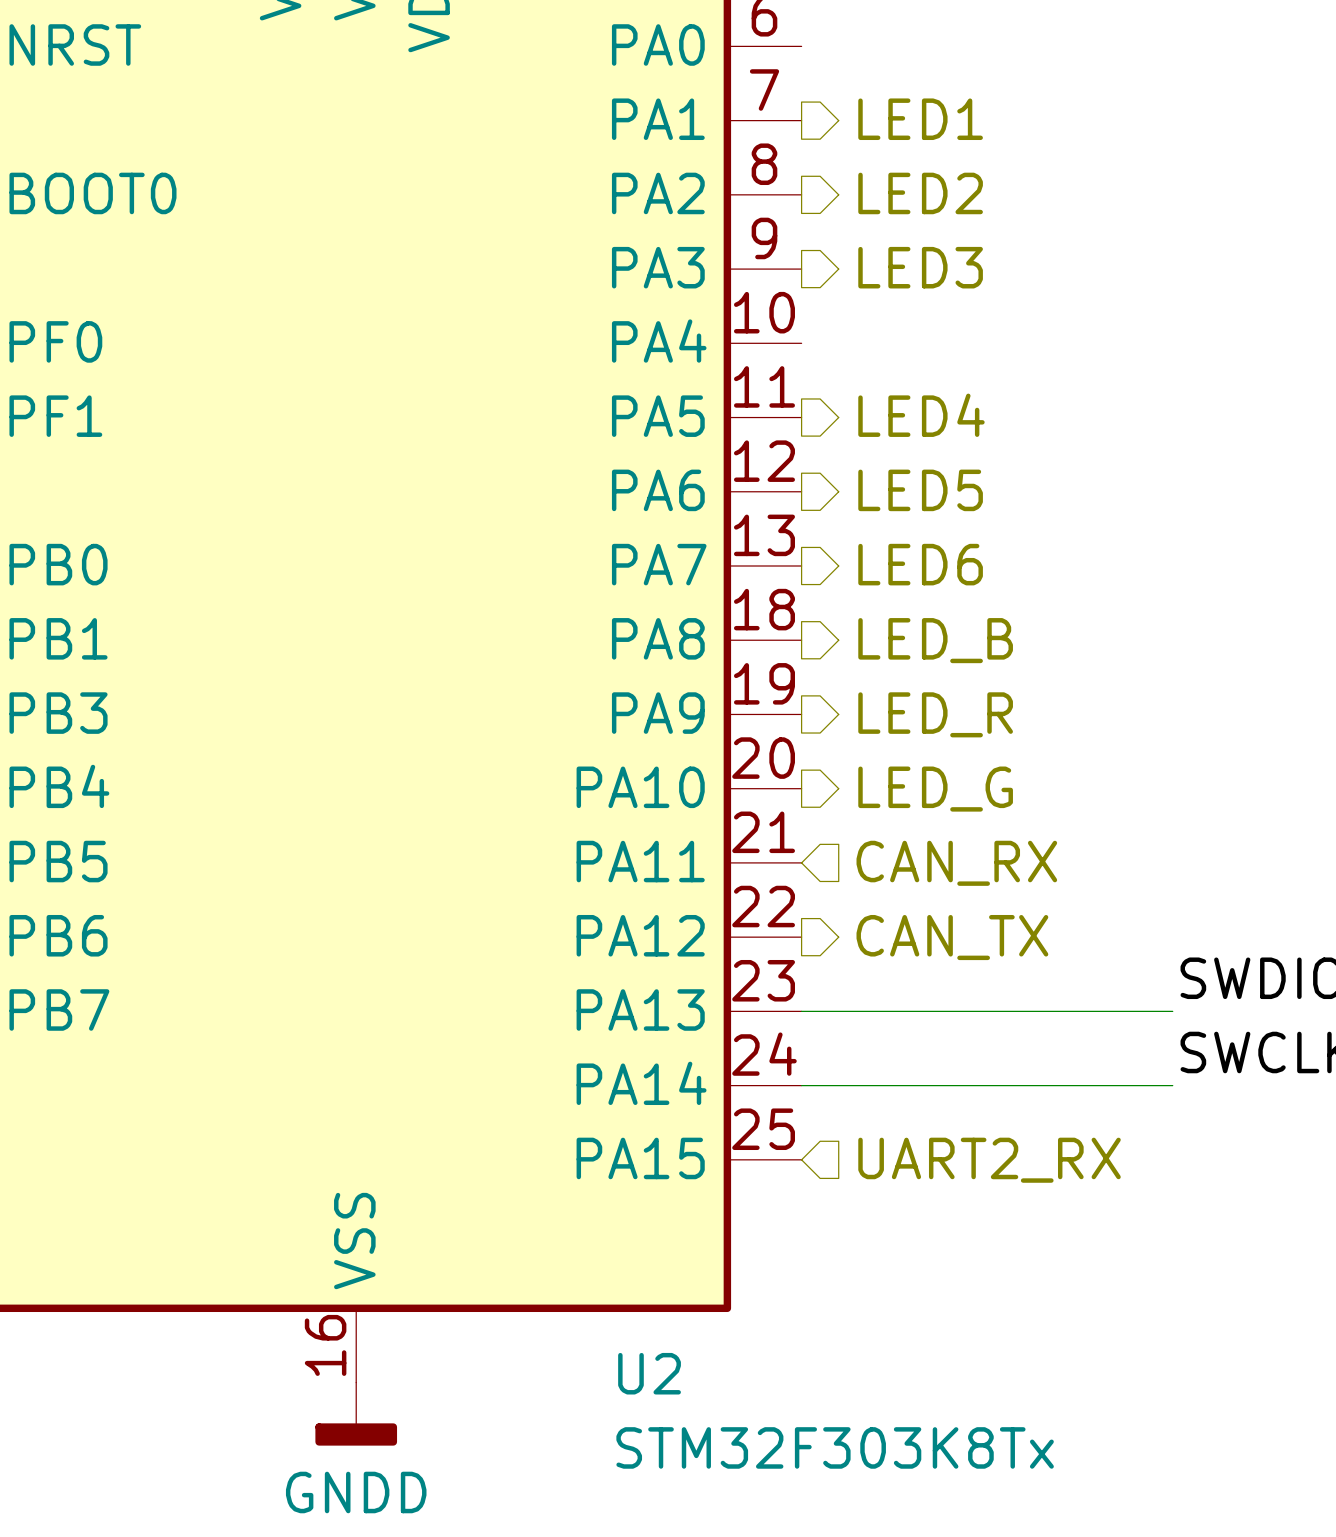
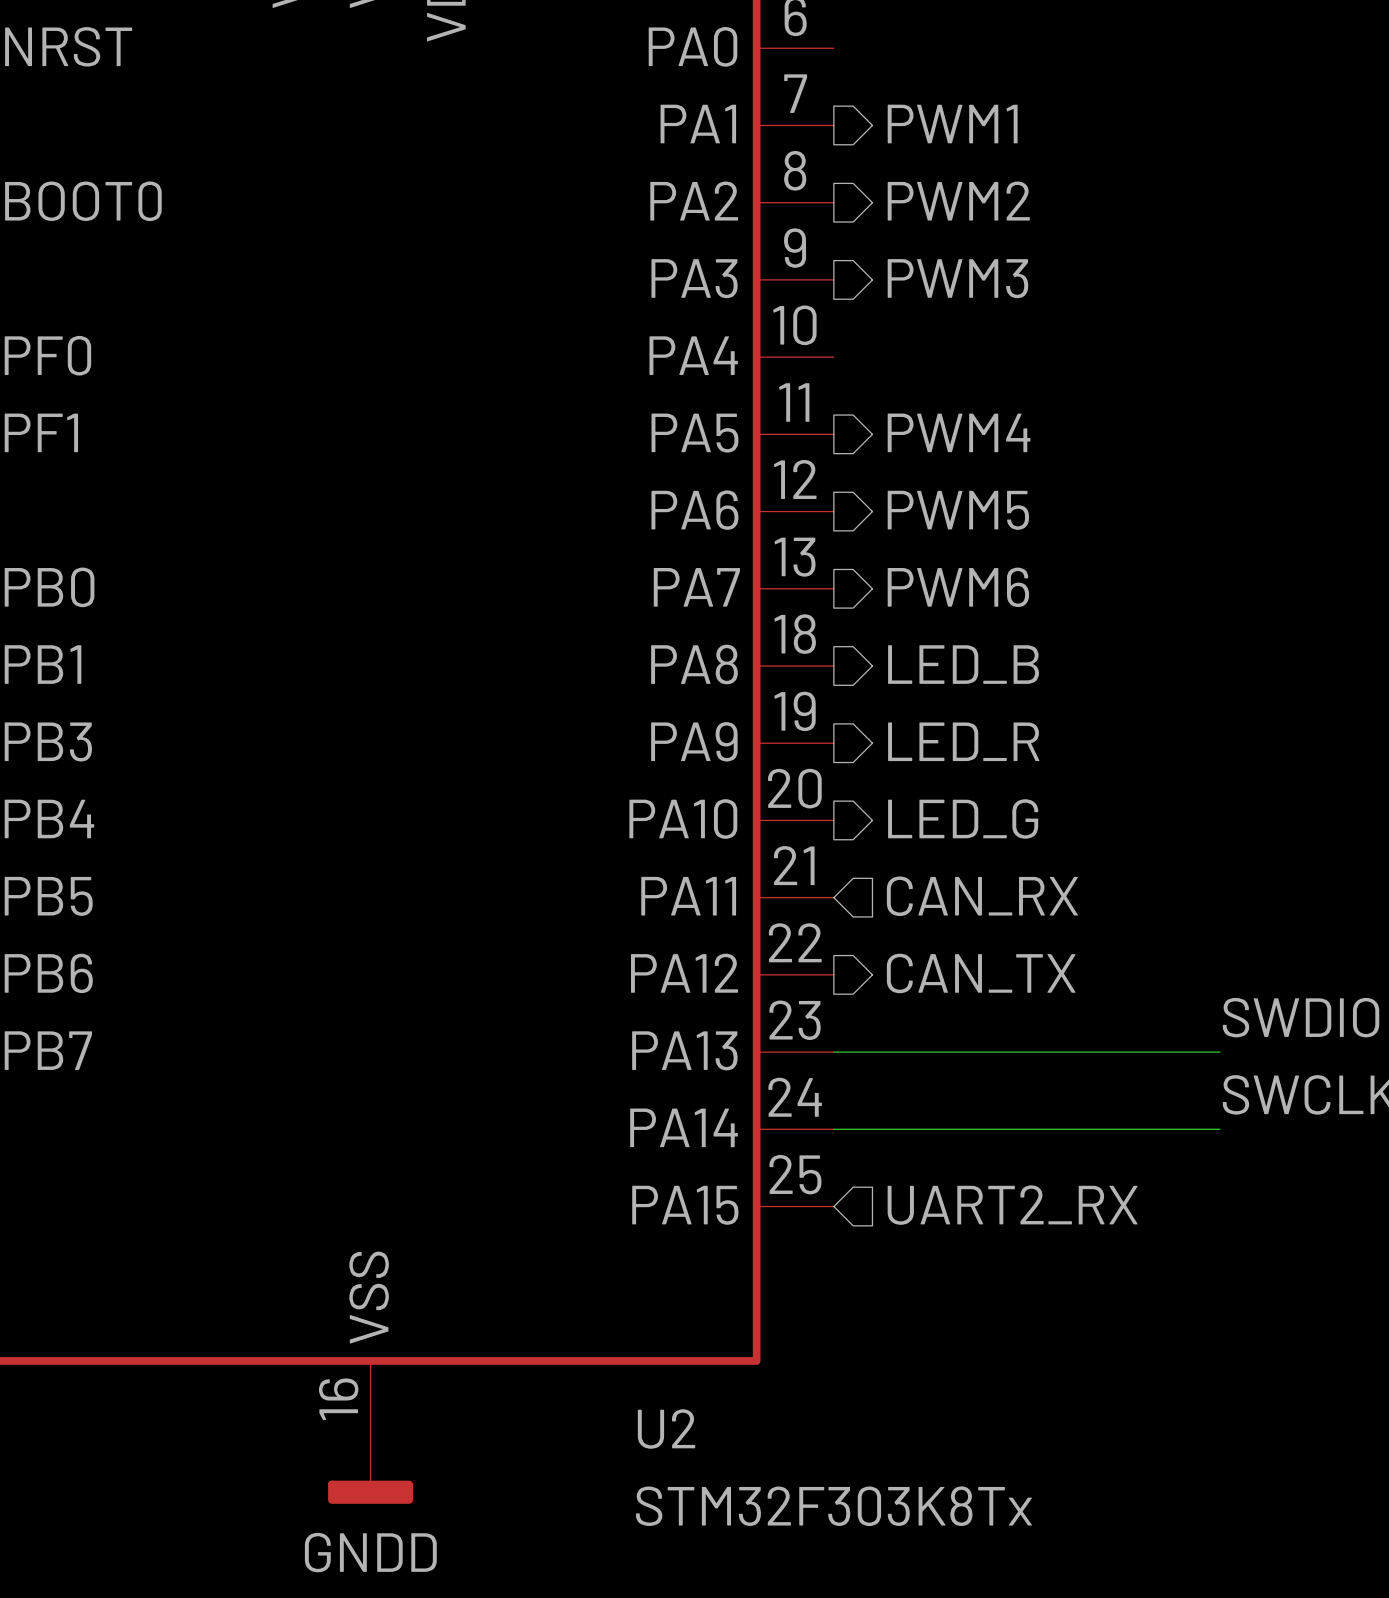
hierarchical label: LED1 (920, 119) -> PWM1 (952, 124)
hierarchical label: LED2 (920, 193) -> PWM2 (958, 201)
hierarchical label: LED3 (920, 267) -> PWM3 (957, 278)
hierarchical label: LED4 (921, 415) -> PWM4 (959, 432)
hierarchical label: LED5 (920, 490) -> PWM5 (958, 510)
hierarchical label: LED6 (920, 564) -> PWM6 (958, 587)

